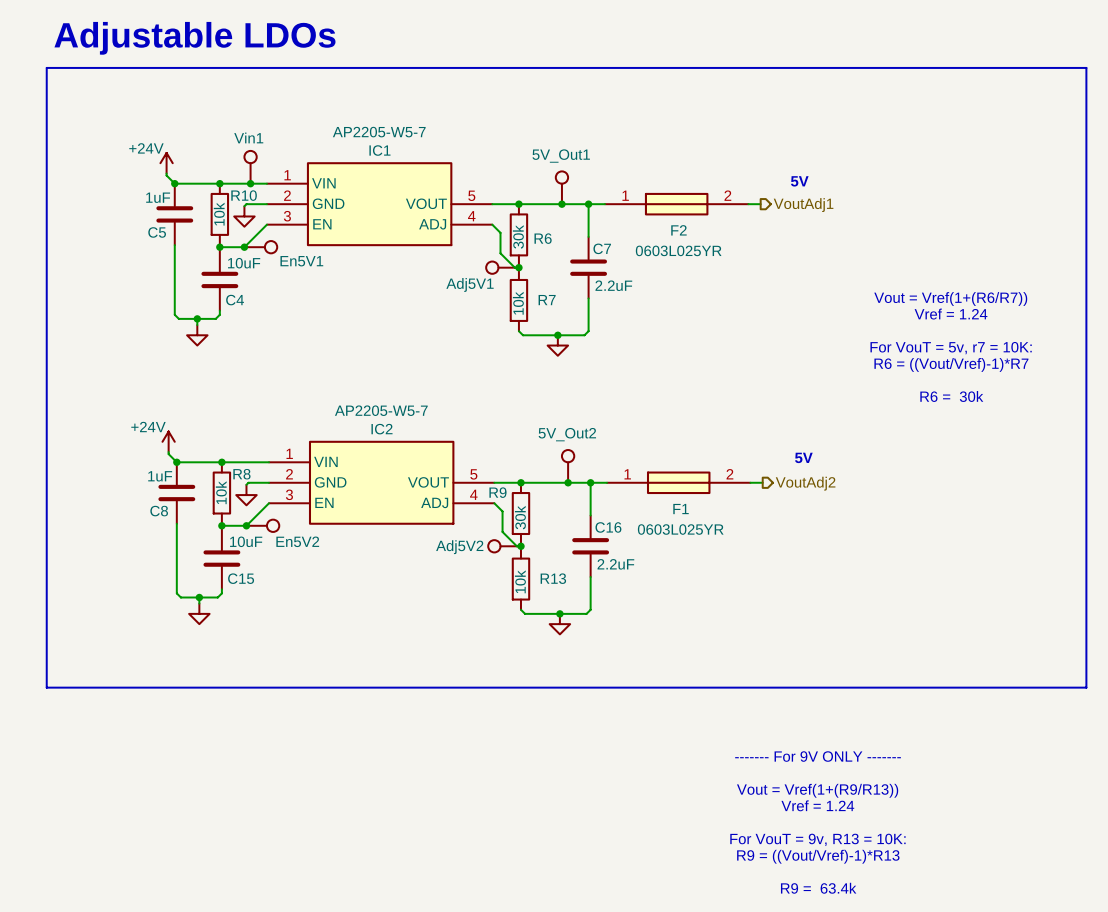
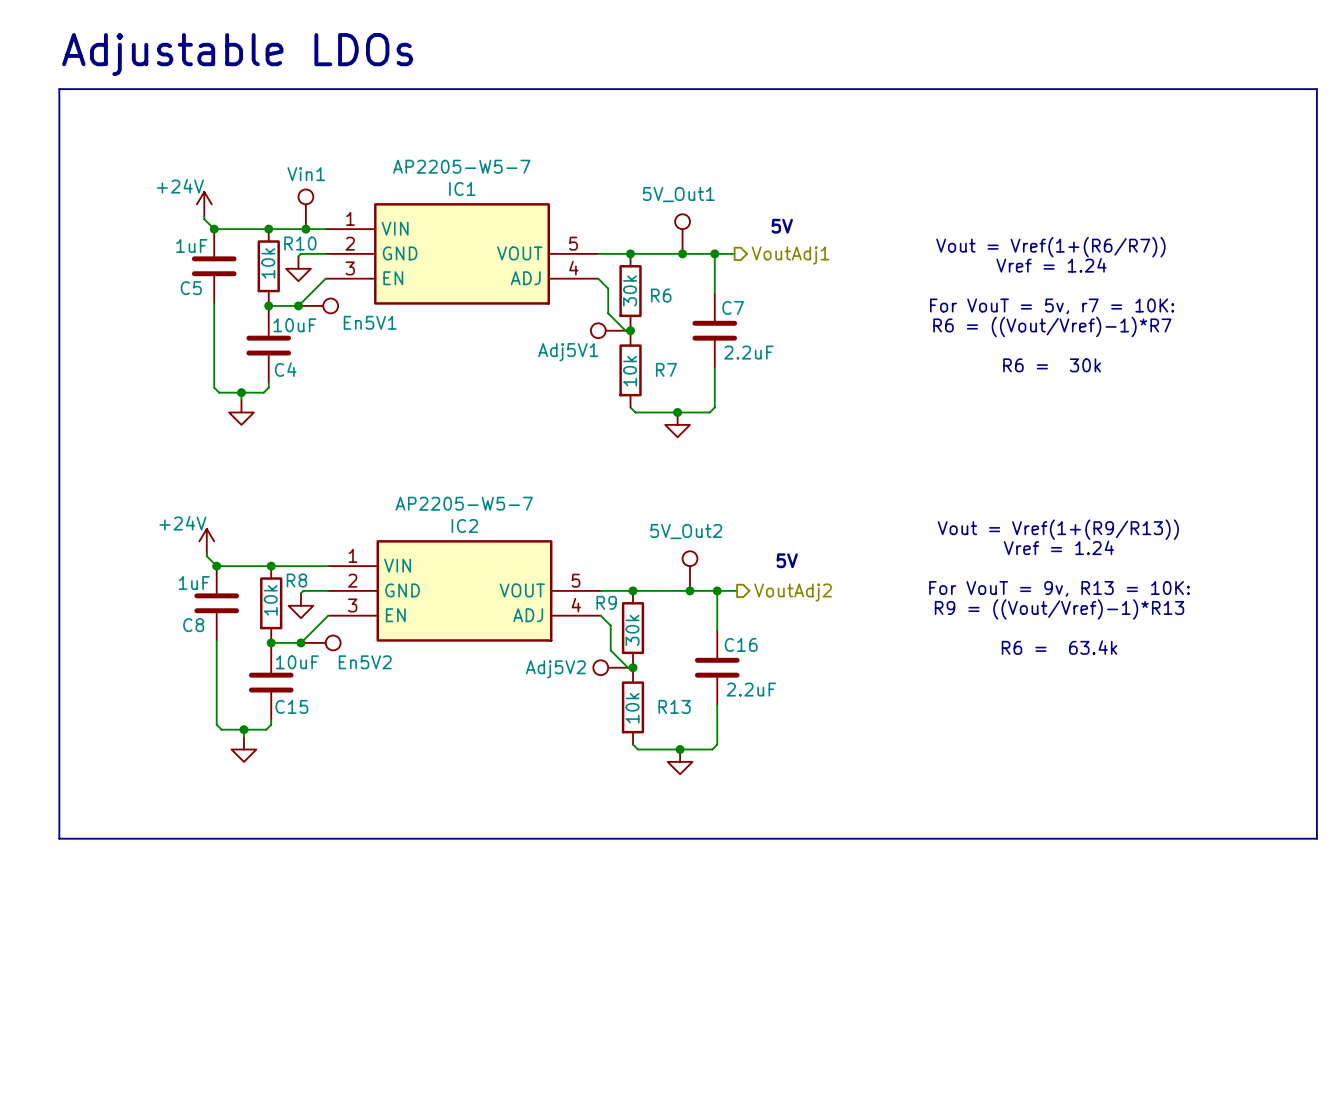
text position: 5V (799, 181) -> 5V (782, 226)
F2: 0603L025YR (676, 204) -> none
wire: (748, 204) (760, 204) -> none
hierarchical label position: VoutAdj1 (803, 205) -> VoutAdj1 (790, 255)
text: none -> Vref = 1.24 (1051, 265)
text position: Vout = Vref(1+(R6/R7)) (950, 299) -> Vout = Vref(1+(R6/R7)) (1050, 247)
text: Vref = 1.24 (951, 314) -> none
text position: For VouT = 5v, r7 = 10K: (951, 348) -> For VouT = 5v, r7 = 10K: (1052, 306)
text position: R6 = ((Vout/Vref)-1)*R7 (951, 364) -> R6 = ((Vout/Vref)-1)*R7 (1052, 326)
text position: R6 = 30k (951, 396) -> R6 = 30k (1052, 365)
text: none -> Vout = Vref(1+(R9/R13)) (1058, 529)
text: none -> Vref = 1.24 (1058, 547)
text position: 5V (803, 457) -> 5V (787, 560)
text: none -> For VouT = 9v, R13 = 10K: (1059, 588)
F1: 0603L025YR (678, 482) -> none
wire: (750, 482) (762, 482) -> none
hierarchical label position: VoutAdj2 (805, 483) -> VoutAdj2 (793, 592)
text: none -> R9 = ((Vout/Vref)-1)*R13 (1059, 609)
text: none -> R6 = 63.4k (1059, 647)
text: ------- For 9V ONLY ------- (818, 756) -> none
text: Vout = Vref(1+(R9/R13)) (817, 790) -> none
text: Vref = 1.24 (817, 805) -> none
text: For VouT = 9v, R13 = 10K: (817, 839) -> none
text: R9 = ((Vout/Vref)-1)*R13 (818, 856) -> none
text: R9 = 63.4k (818, 888) -> none

